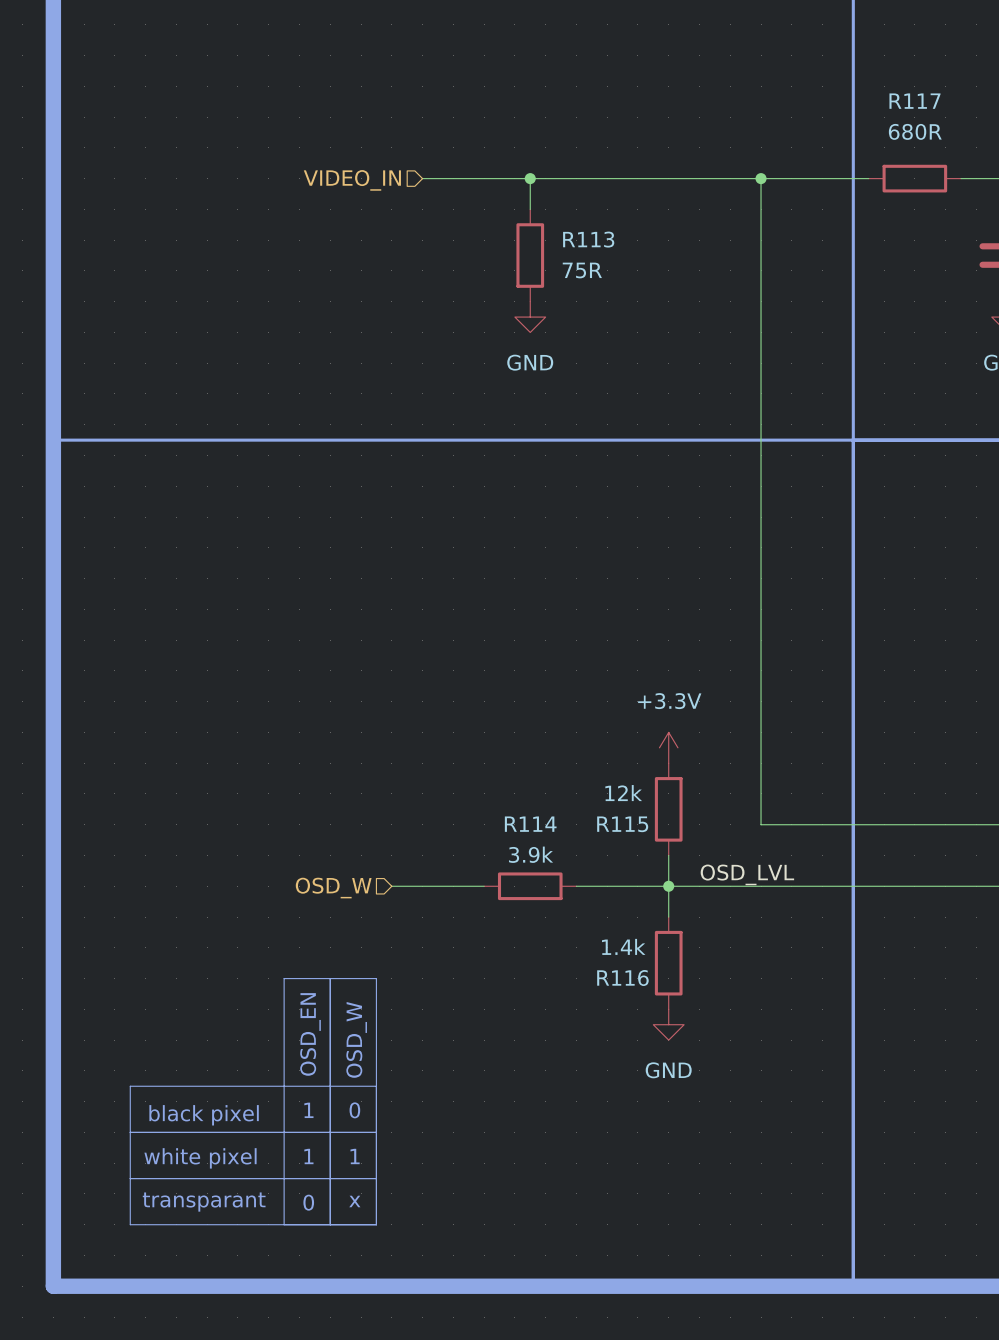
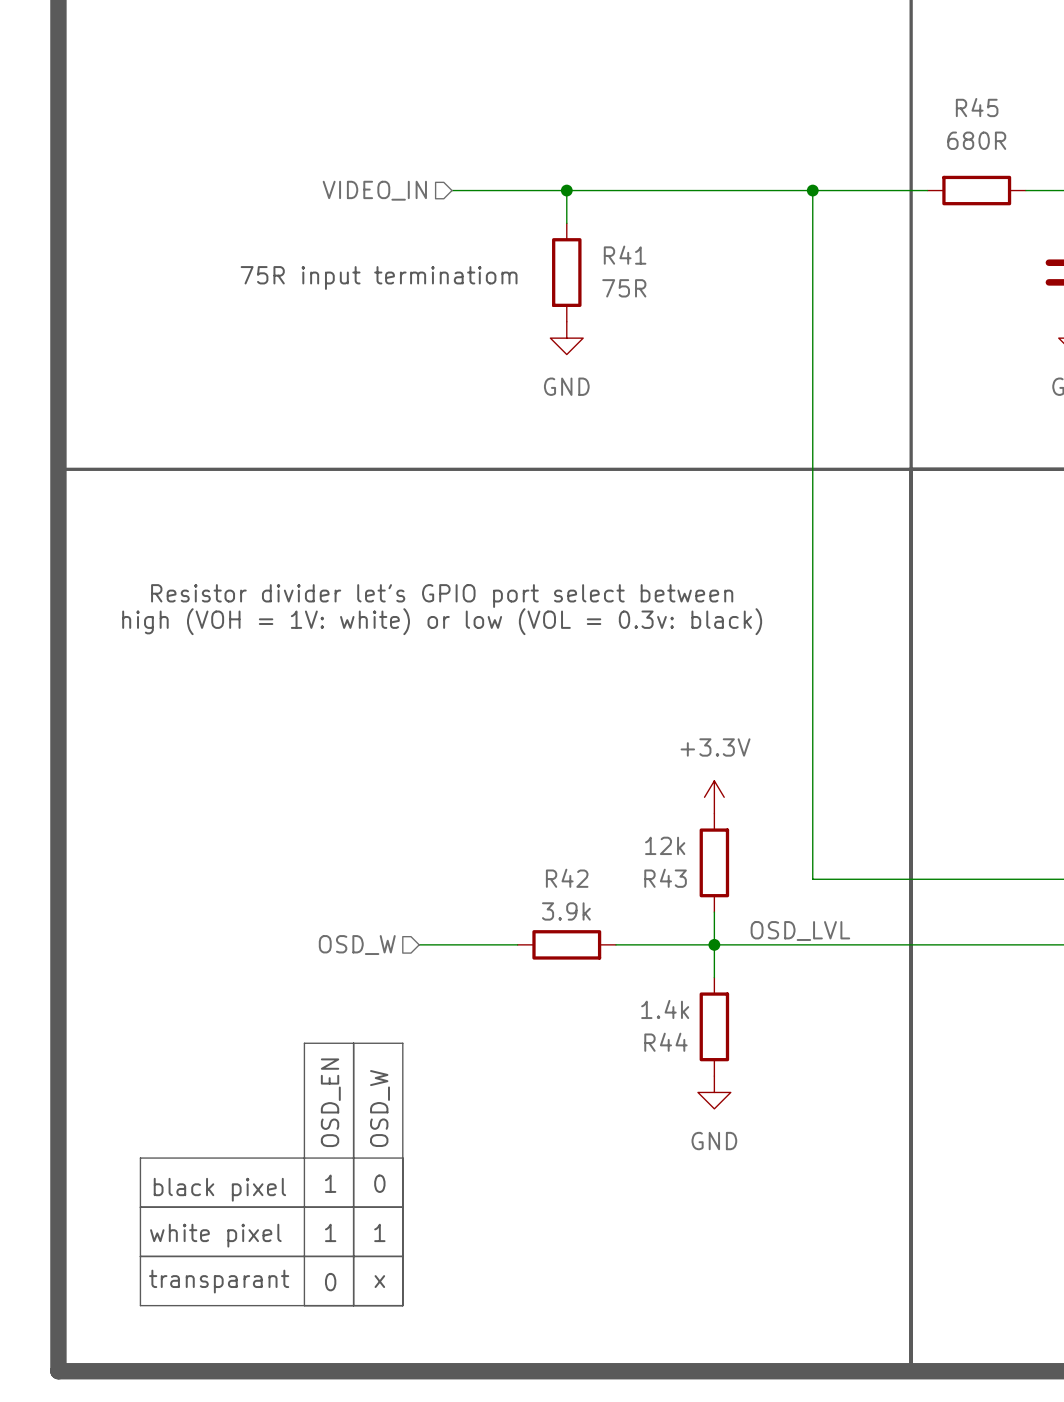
R117 name: R117 (914, 101) -> R45 (977, 107)
R113 name: R113 (588, 239) -> R41 (625, 255)
text: none -> 75R input terminatiom (379, 277)
text: none -> Resistor divider let's GPIO port select between (442, 596)
text: none -> high (VOH = 1V: white) or low (VOL = 0.3v: black) (442, 621)
R114 name: R114 (530, 824) -> R42 (567, 878)
R115 name: R115 (622, 824) -> R43 (665, 878)
R116 name: R116 (622, 978) -> R44 (665, 1042)

